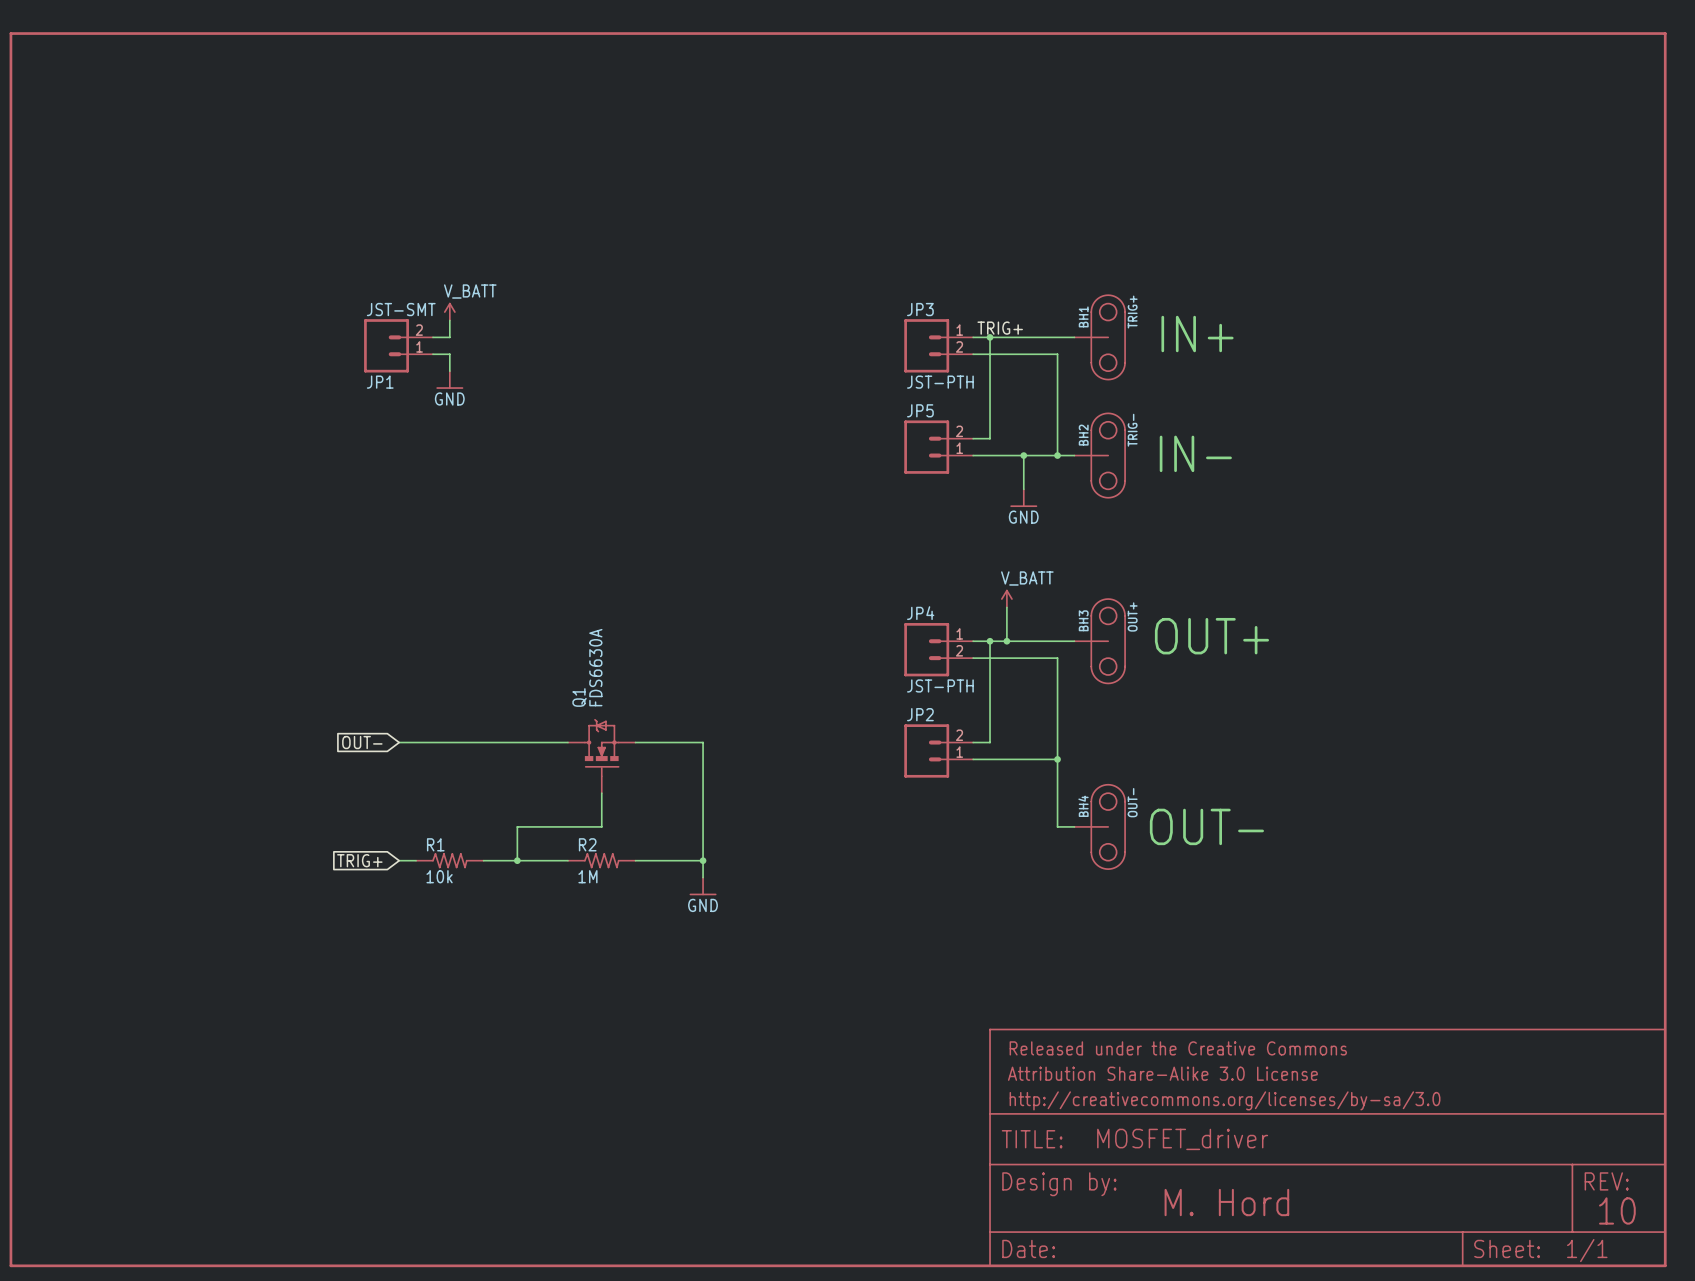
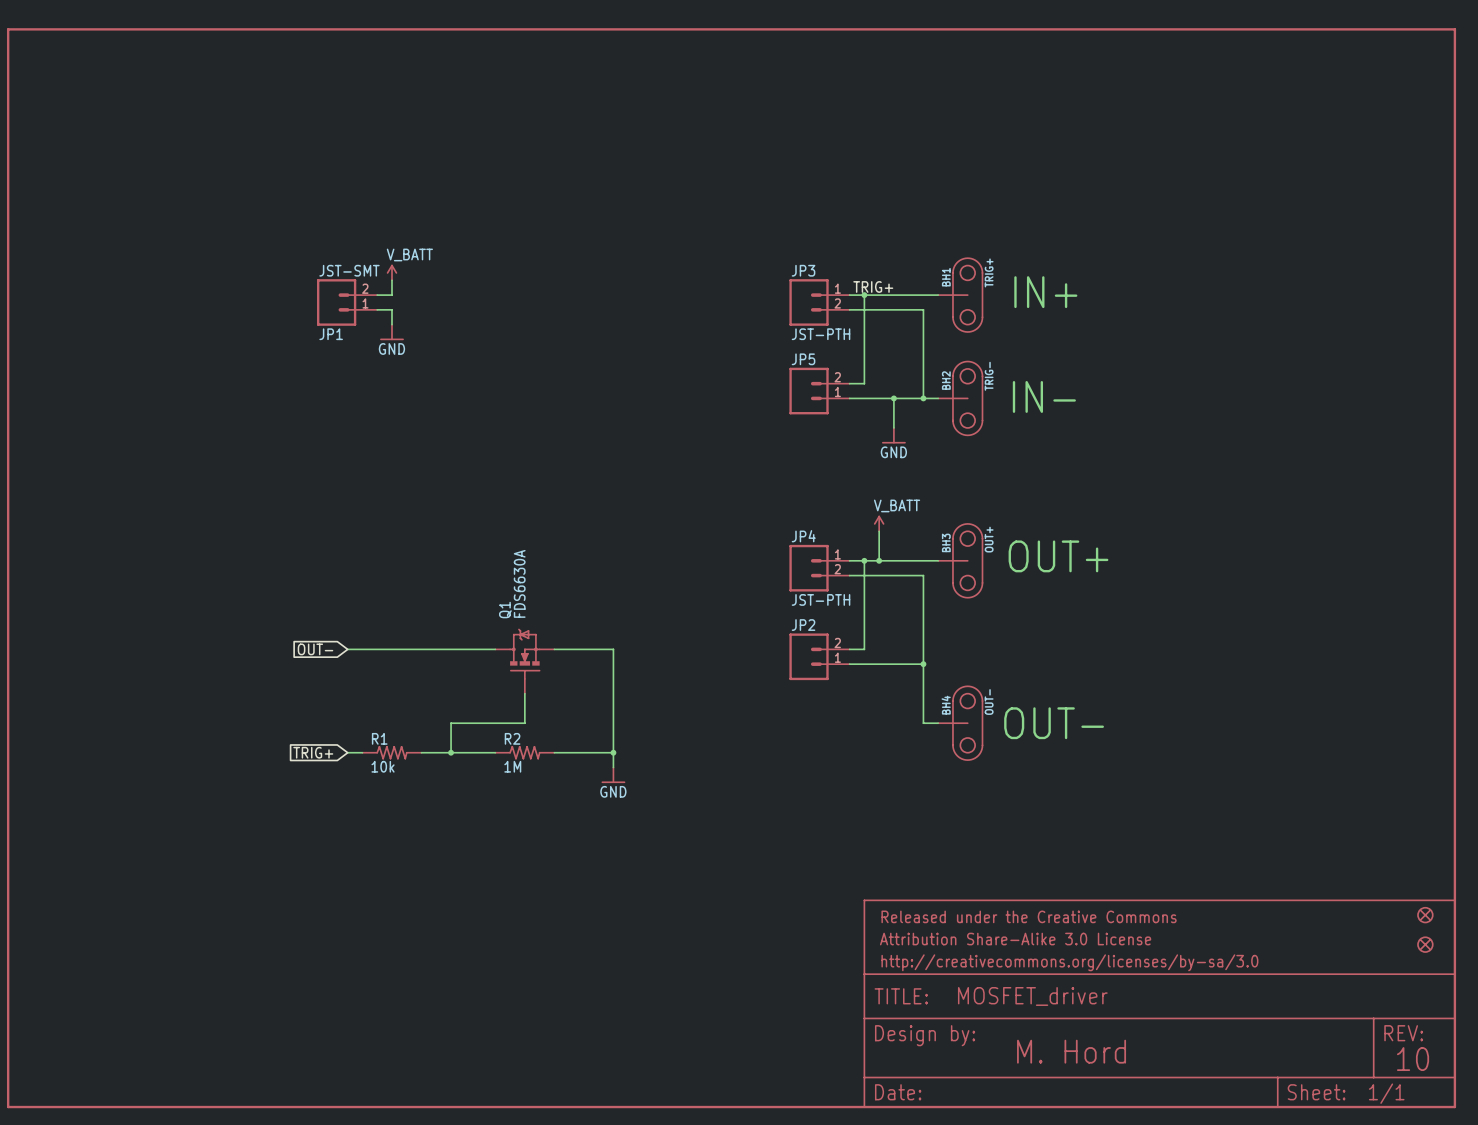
part: none -> (1425, 915)
part: none -> (1425, 944)

